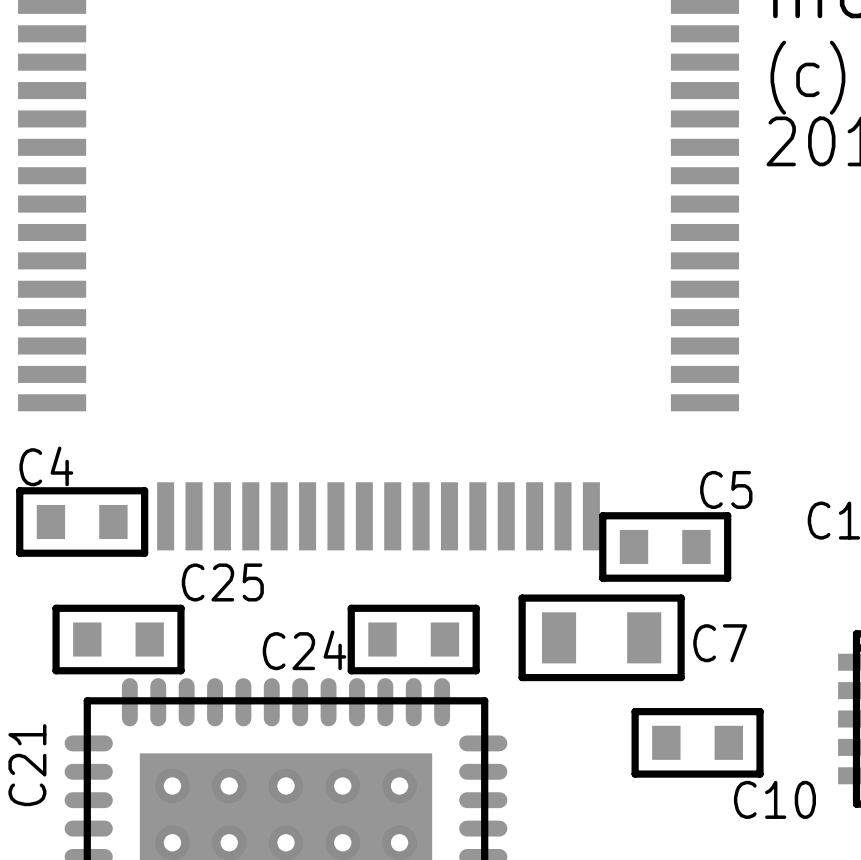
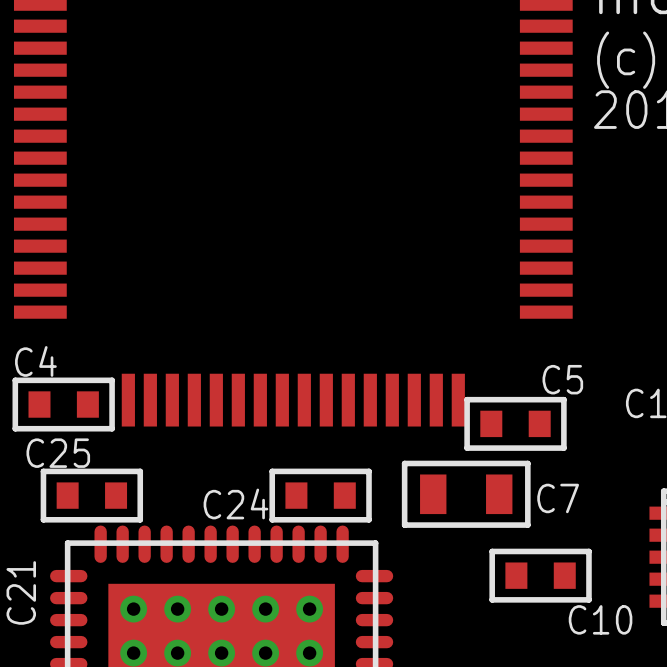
C25 name position: C25 (222, 582) -> C25 (58, 453)

